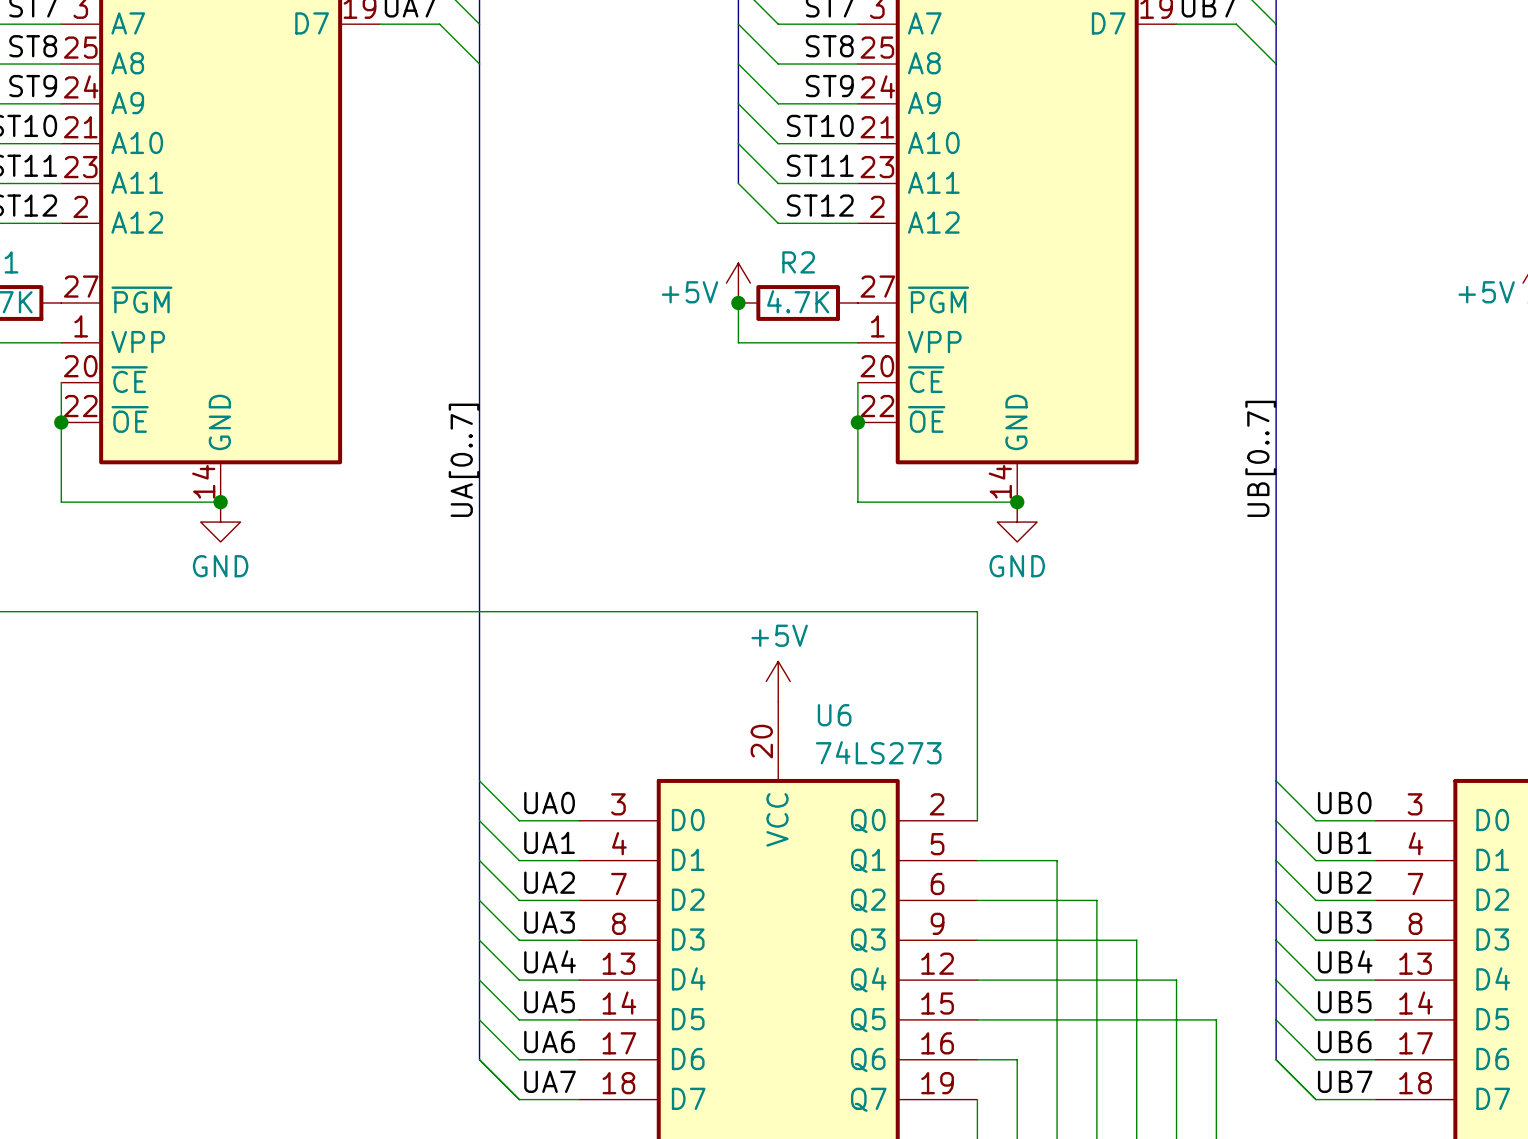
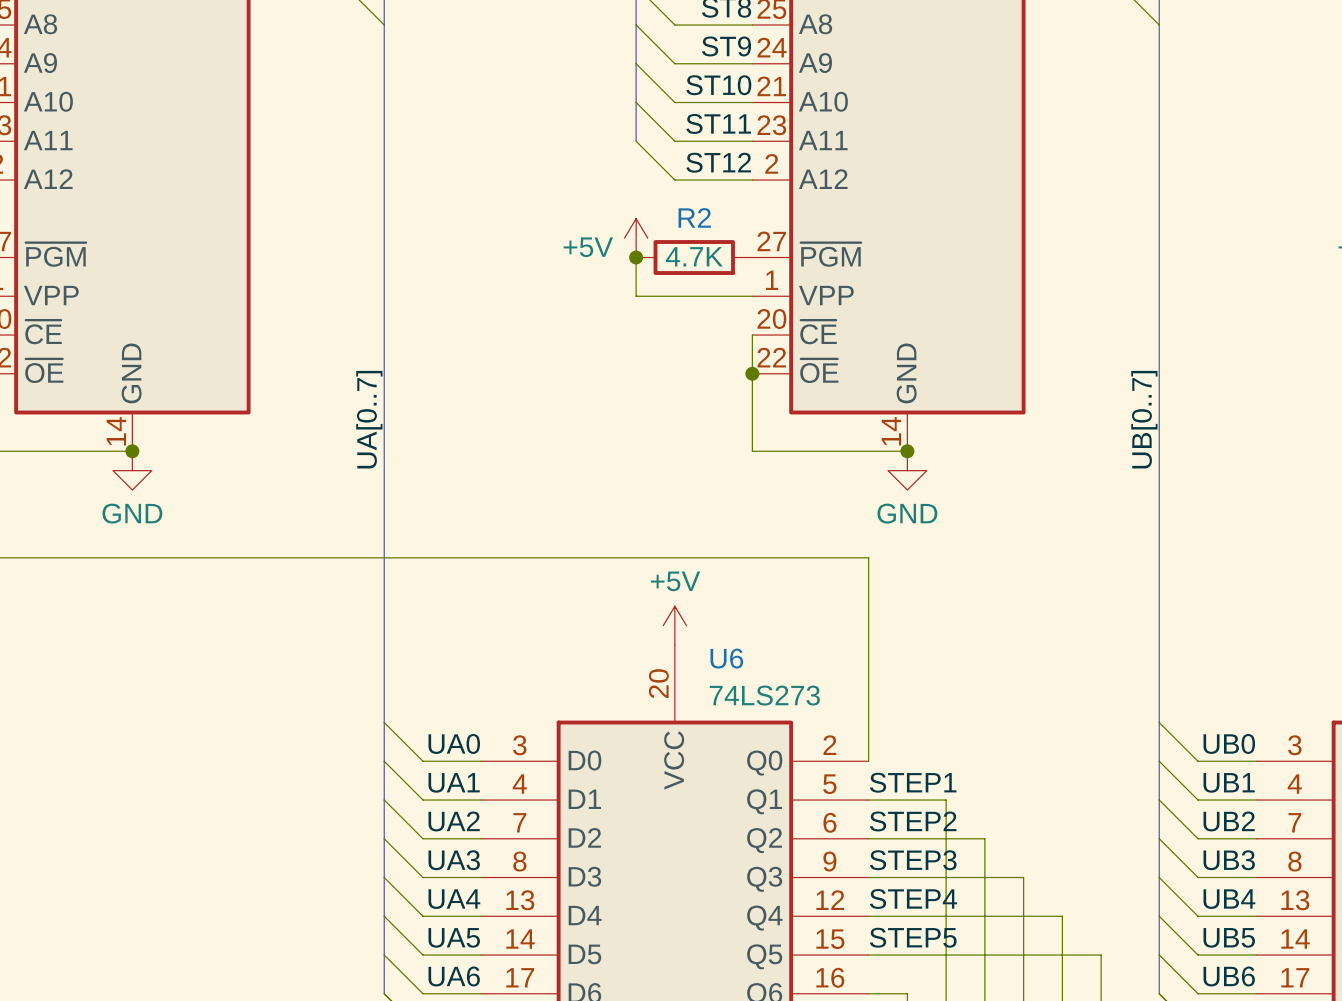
label: none -> STEP1 (913, 782)
label: none -> STEP2 (913, 821)
label: none -> STEP3 (913, 860)
label: none -> STEP4 (913, 898)
label: none -> STEP5 (913, 937)

